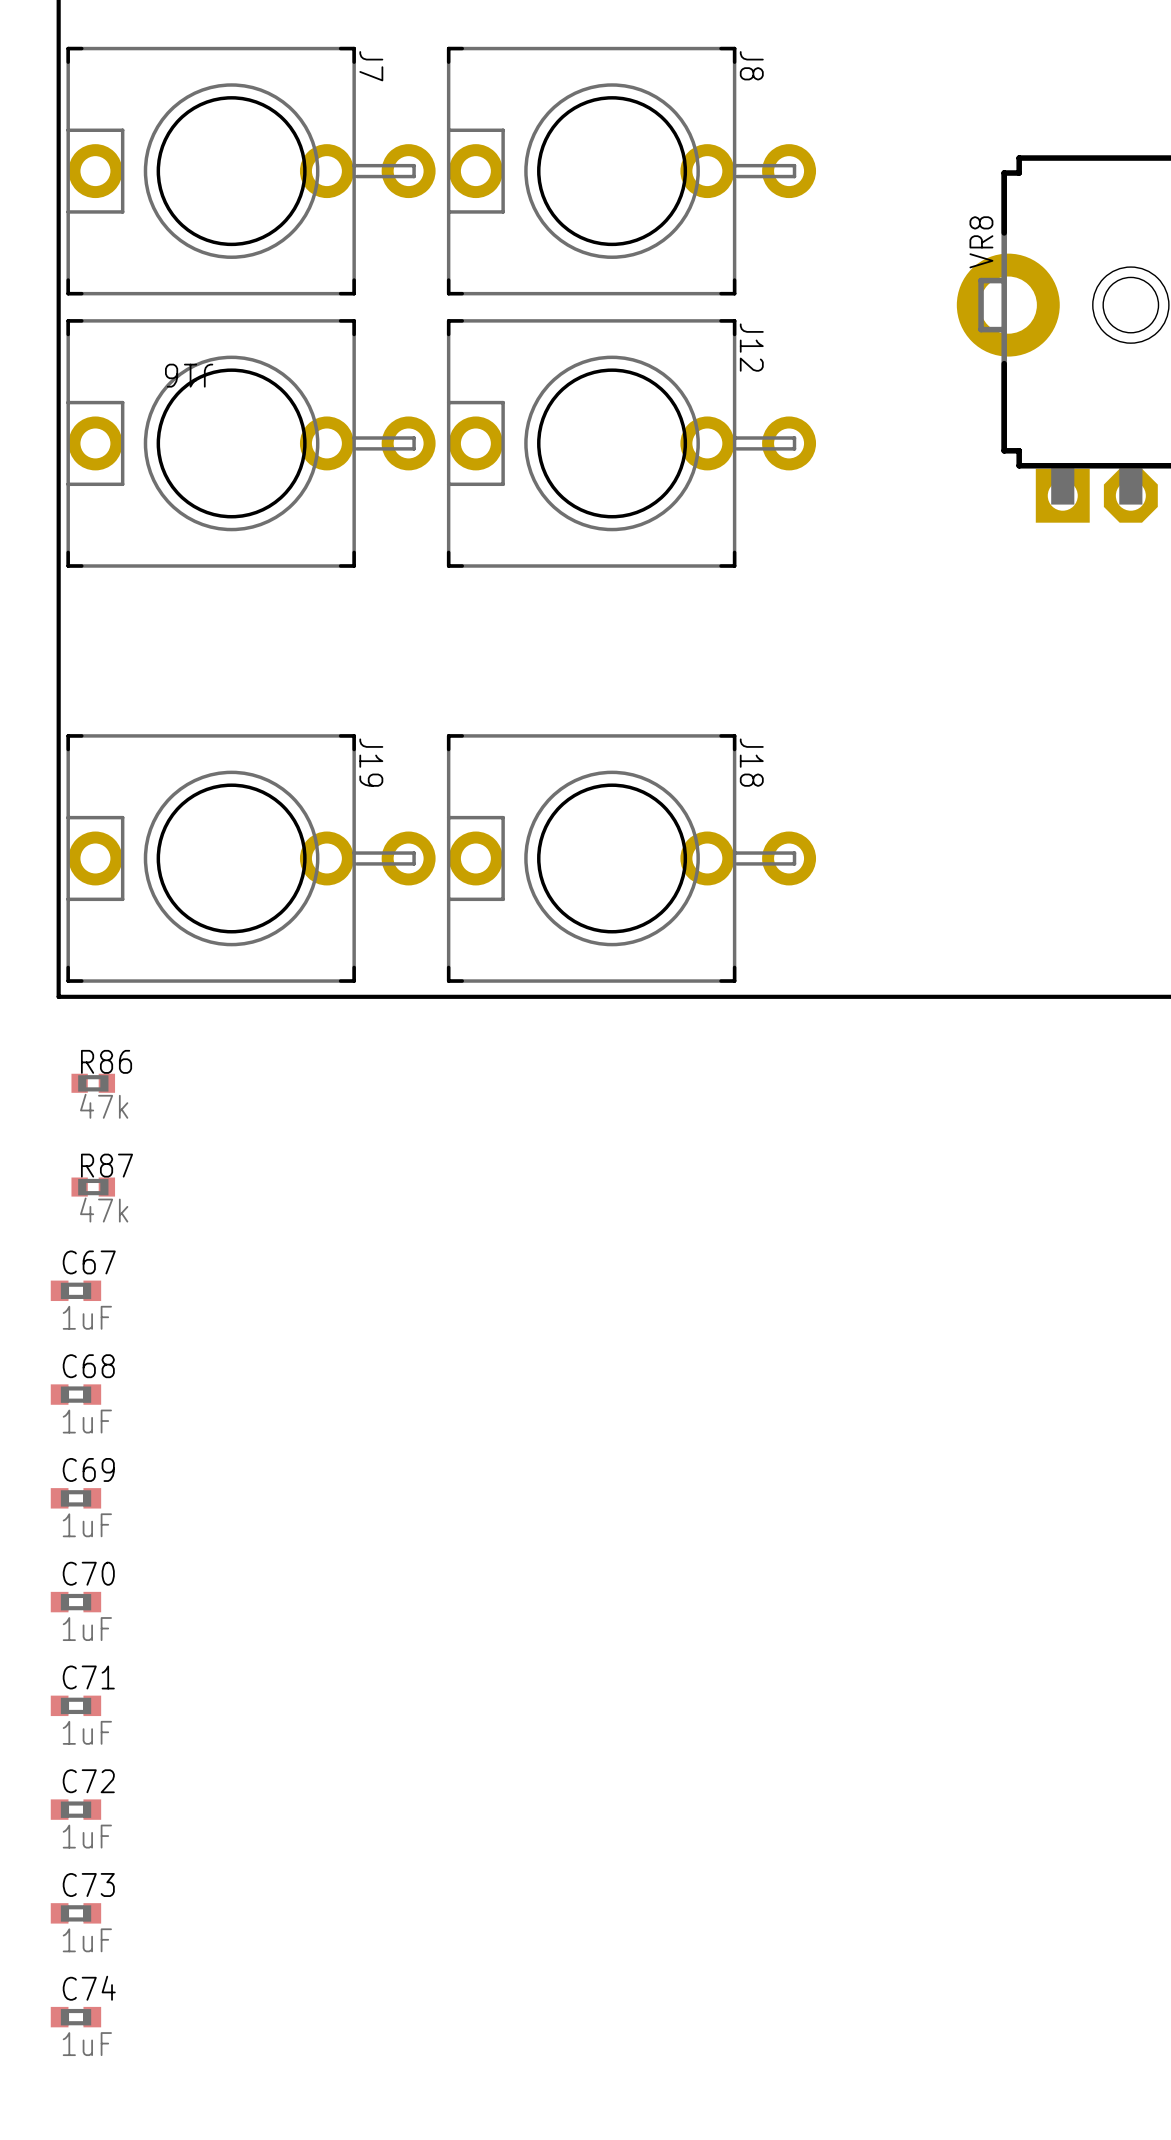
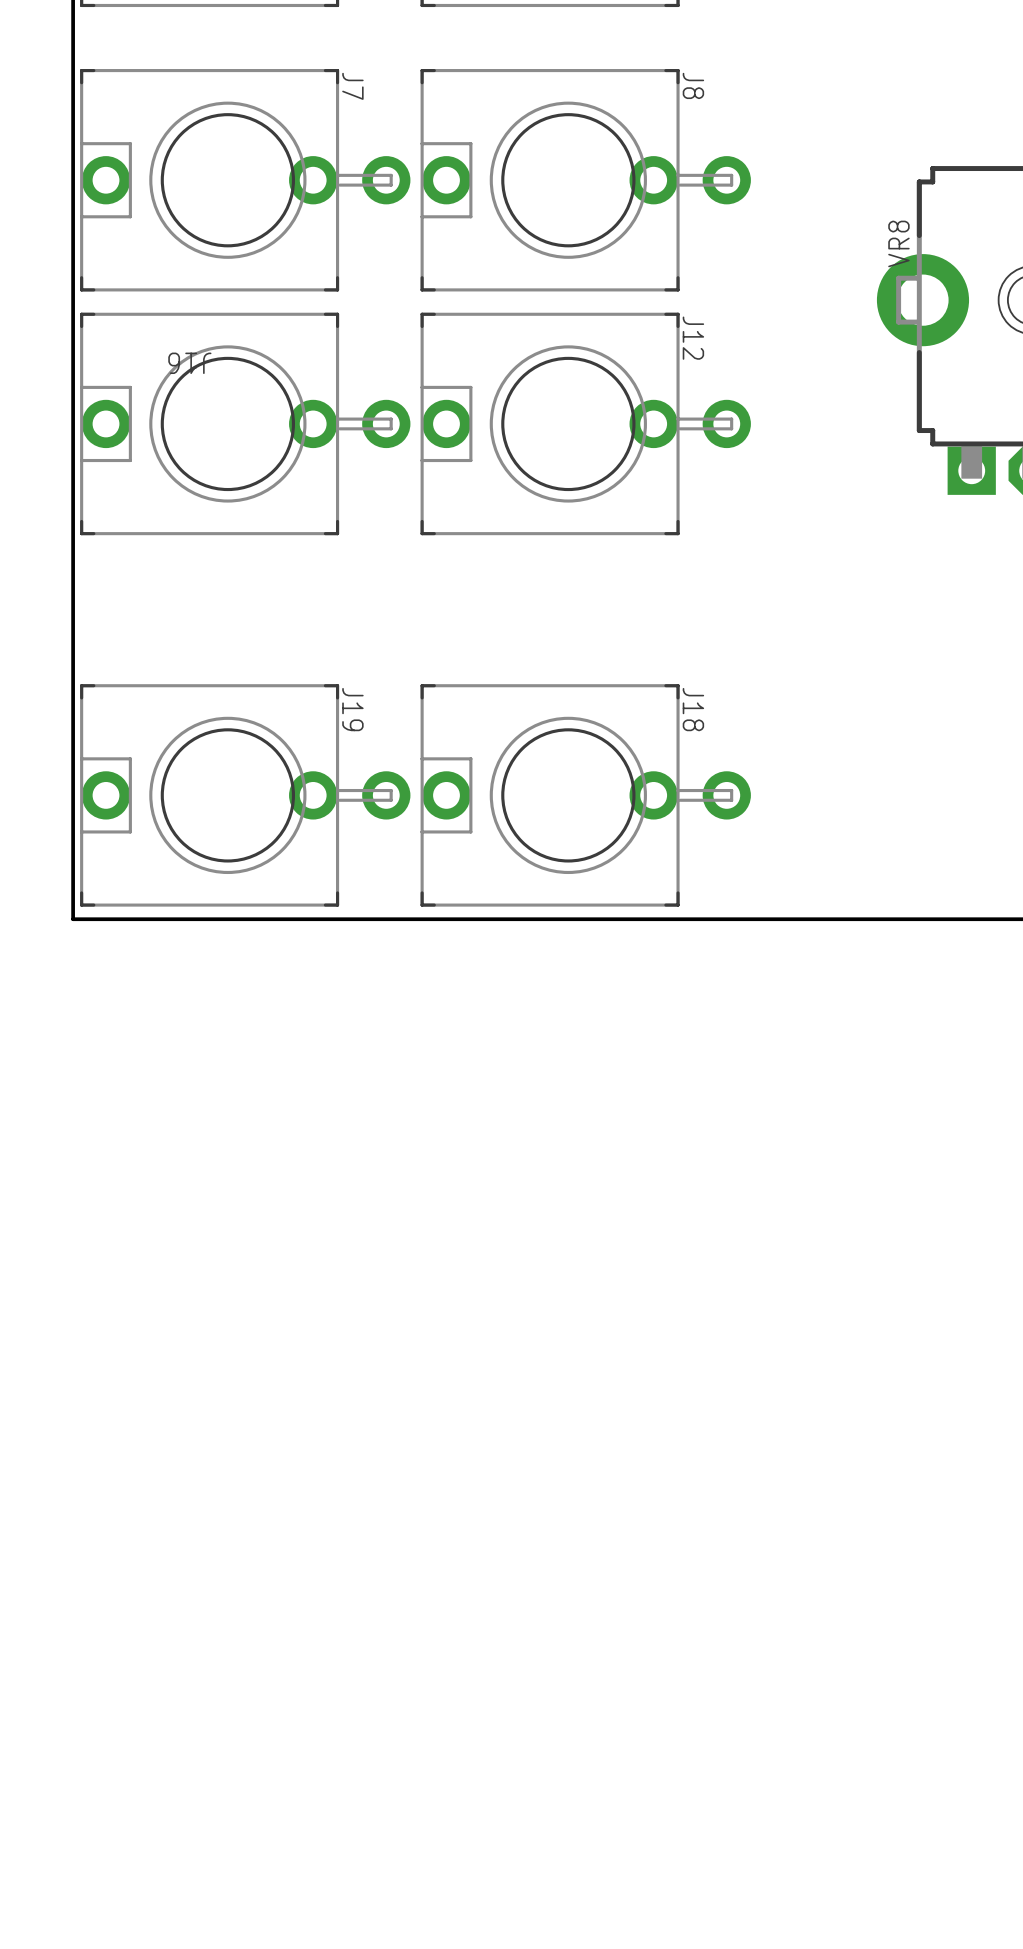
R86: 47k (93, 1083) -> none
R87: 47k (93, 1187) -> none
C67: 1uF (75, 1290) -> none
C68: 1uF (75, 1394) -> none
C69: 1uF (75, 1498) -> none
C70: 1uF (75, 1602) -> none
C71: 1uF (75, 1705) -> none
C72: 1uF (75, 1809) -> none
C73: 1uF (75, 1913) -> none
C74: 1uF (75, 2017) -> none

